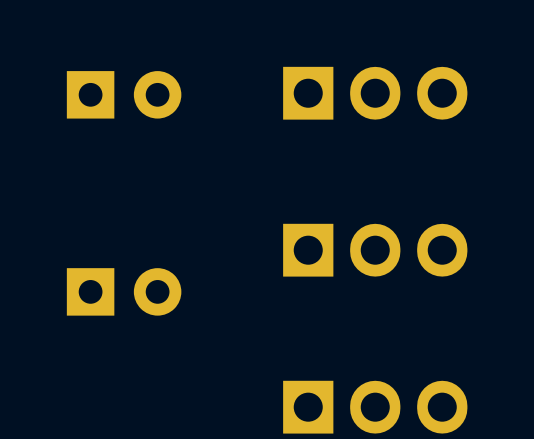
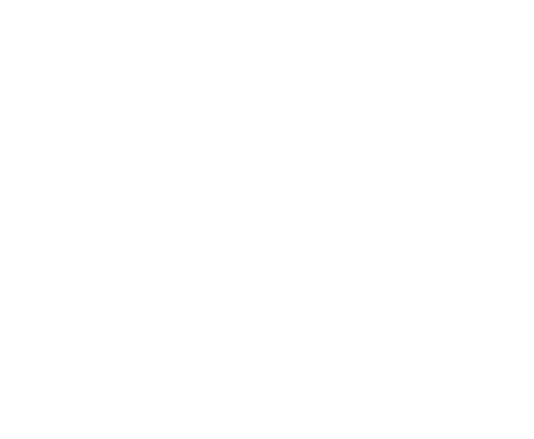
part: (375, 93) -> none
part: (124, 94) -> none
part: (375, 250) -> none
part: (124, 291) -> none
part: (375, 407) -> none

